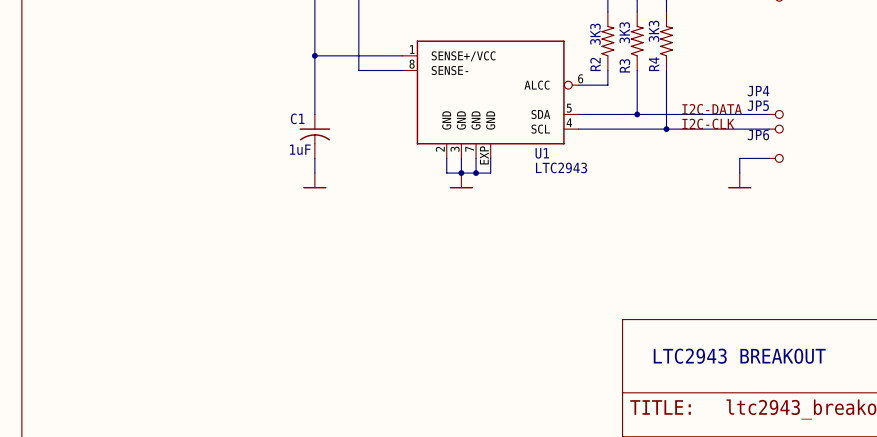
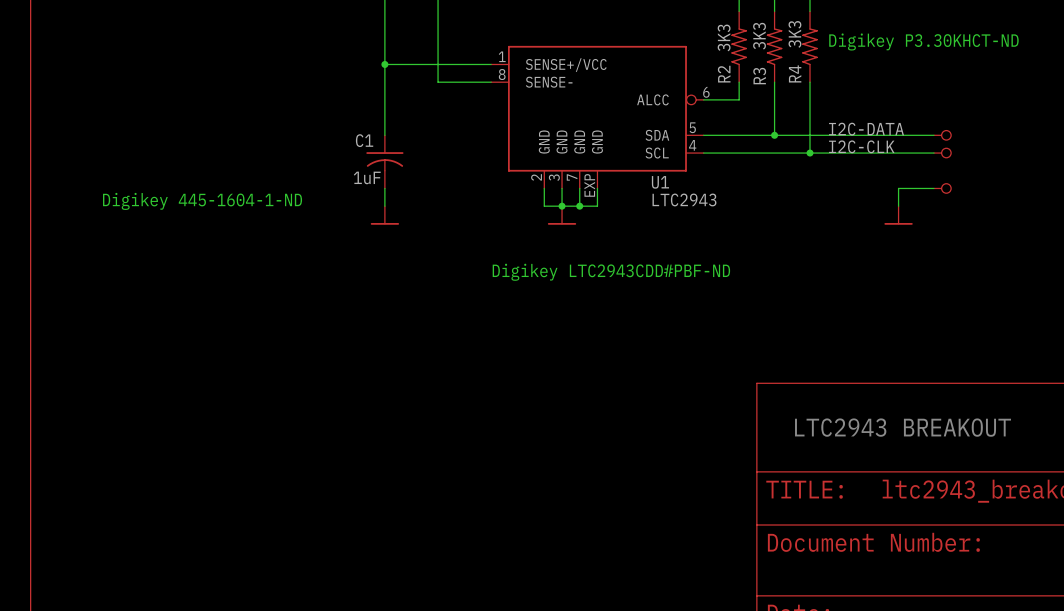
text: none -> Digikey P3.30KHCT-ND (923, 42)
JP4 name: JP4 (758, 91) -> none
JP5 name: JP5 (758, 105) -> none
JP6 name: JP6 (758, 134) -> none
text: none -> Digikey 445-1604-1-ND (202, 201)
text: none -> Digikey LTC2943CDD#PBF-ND (611, 272)

